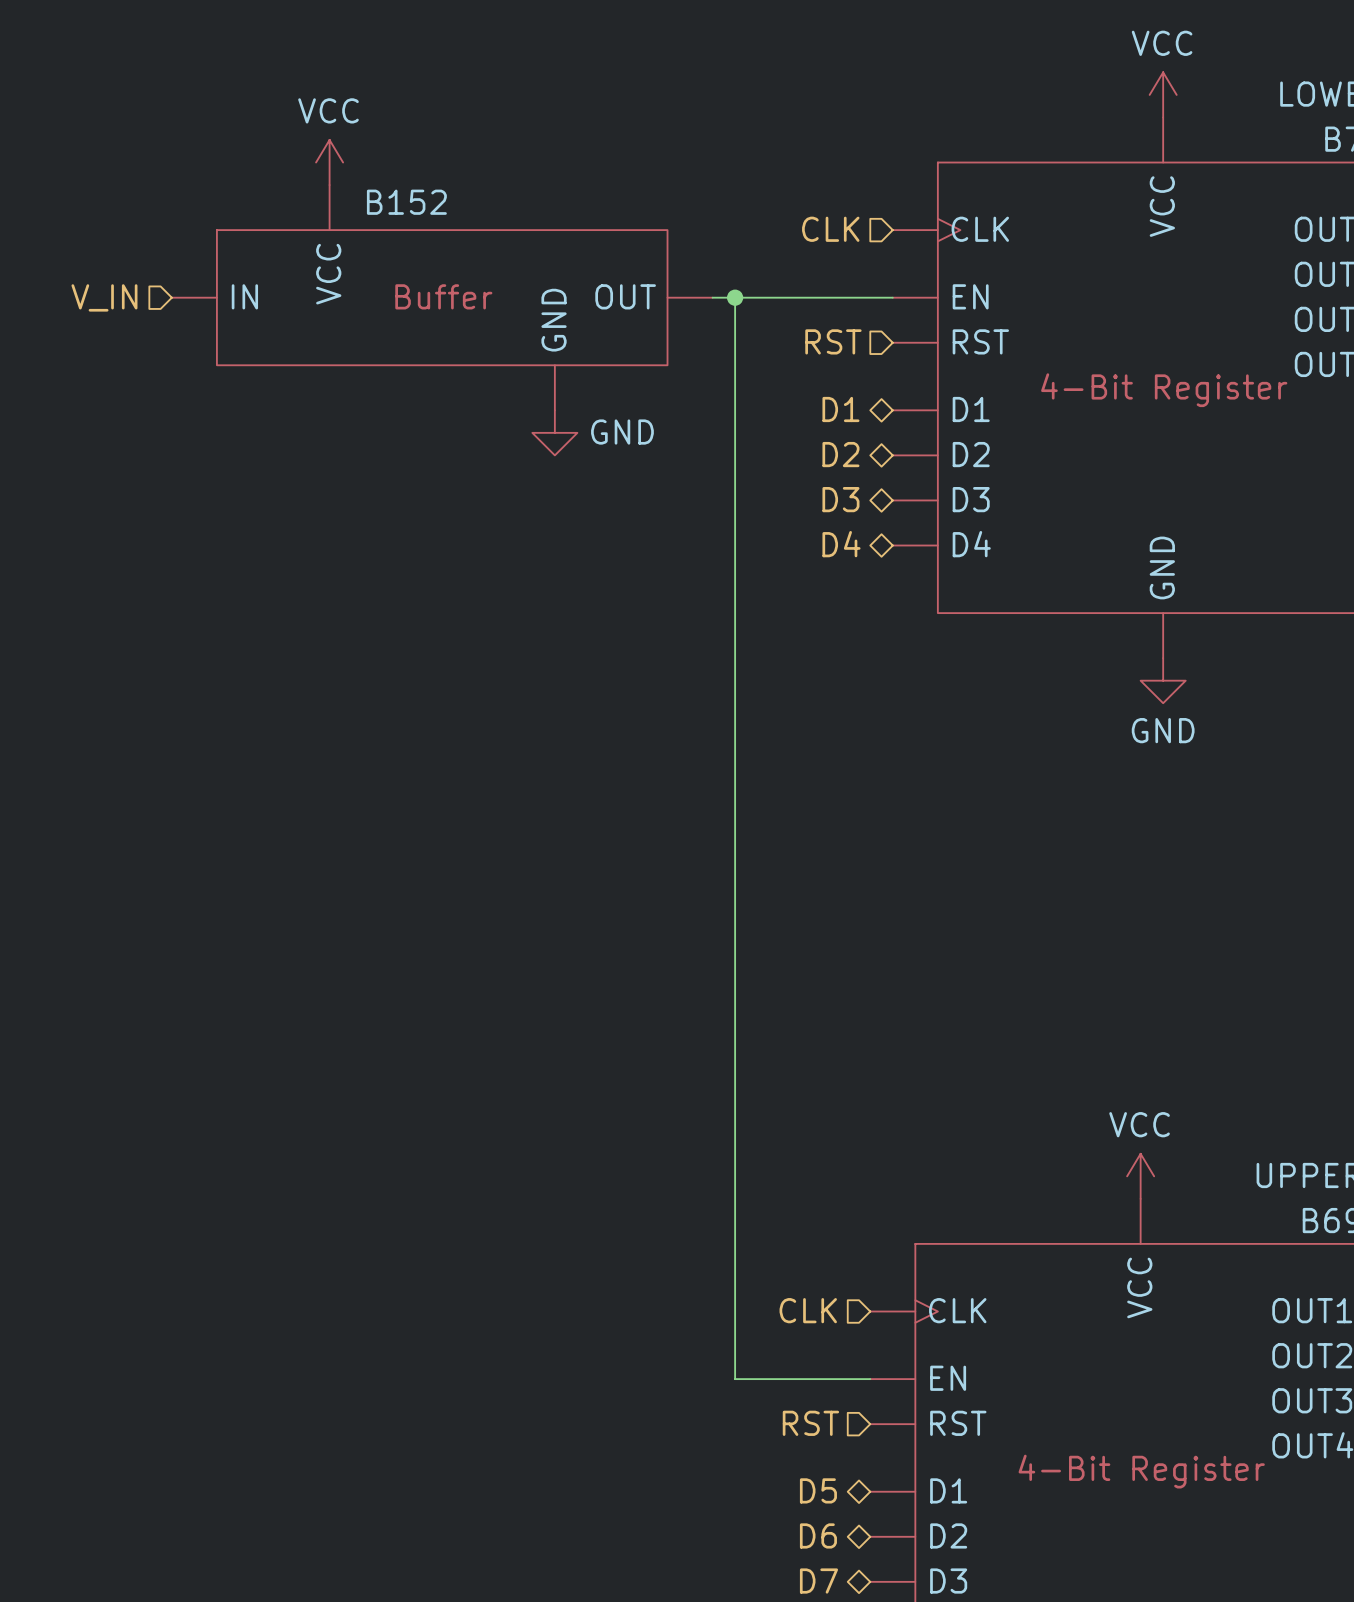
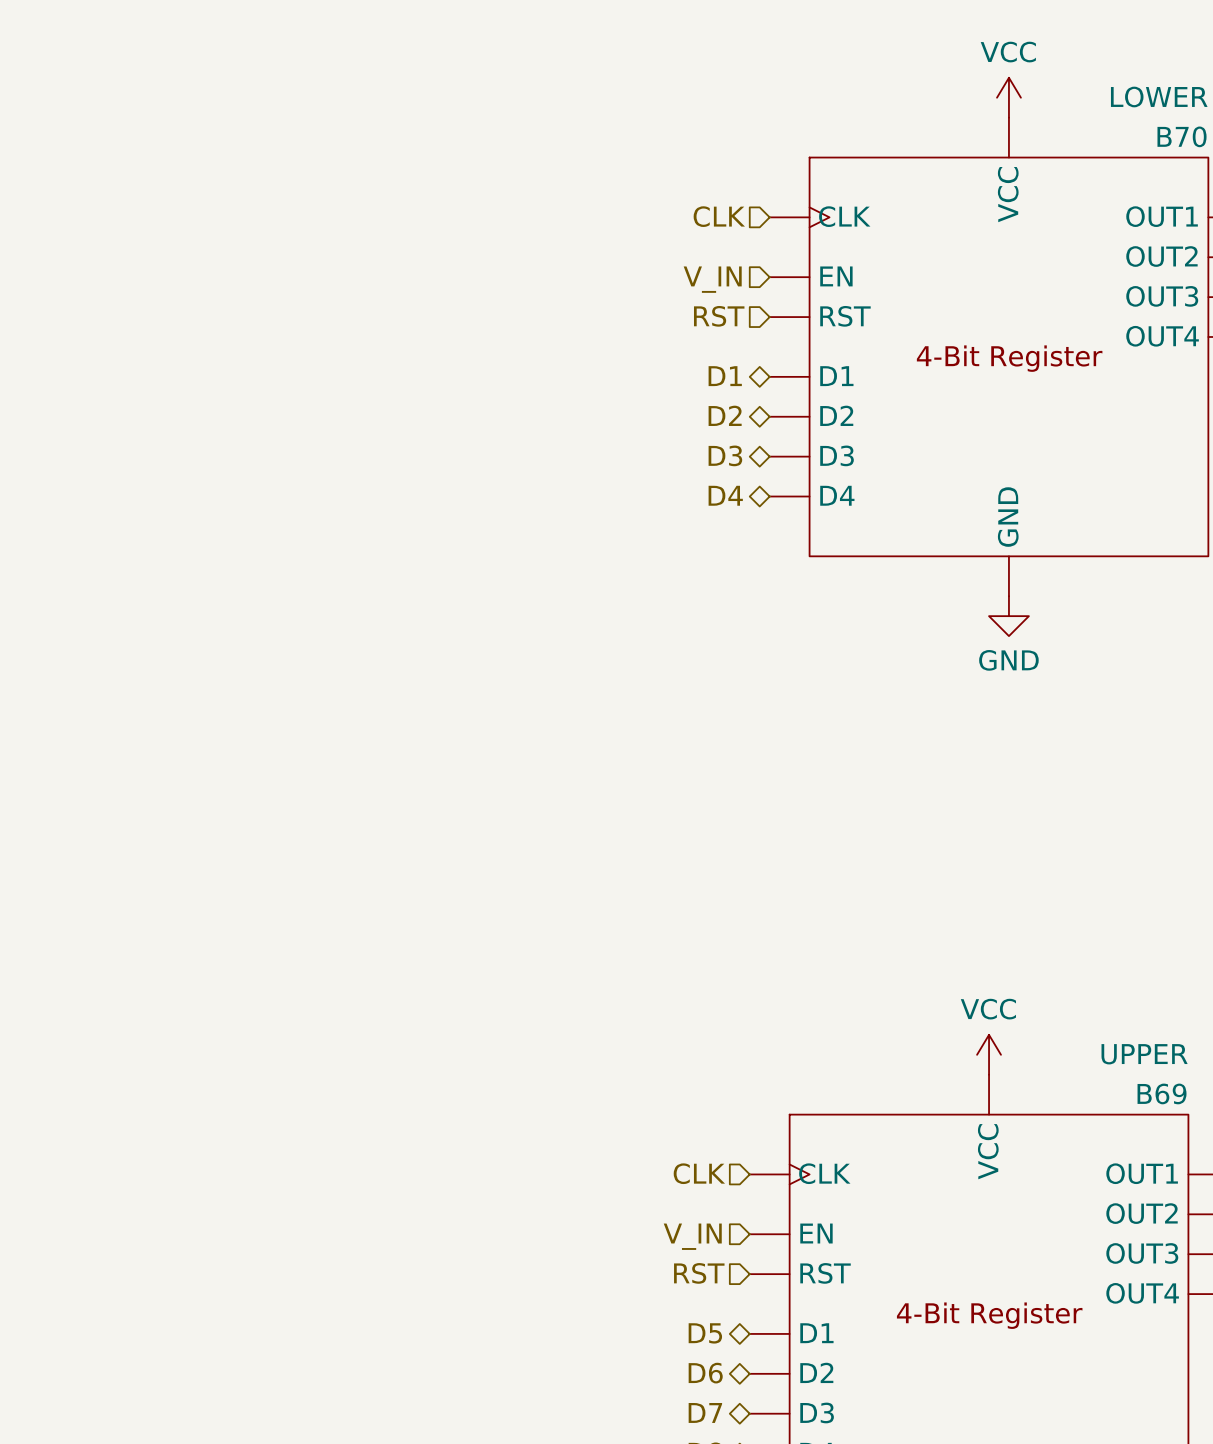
power symbol: VCC (329, 162) -> none
hierarchical label: V_IN (104, 297) -> none
B152: (442, 297) -> none
wire: (712, 297) (892, 297) -> none
wire: (735, 297) (735, 1379) (870, 1379) -> none
junction: (735, 297) -> none
hierarchical label: none -> V_IN (712, 279)
power symbol: GND (554, 432) -> none
hierarchical label: none -> V_IN (692, 1236)

